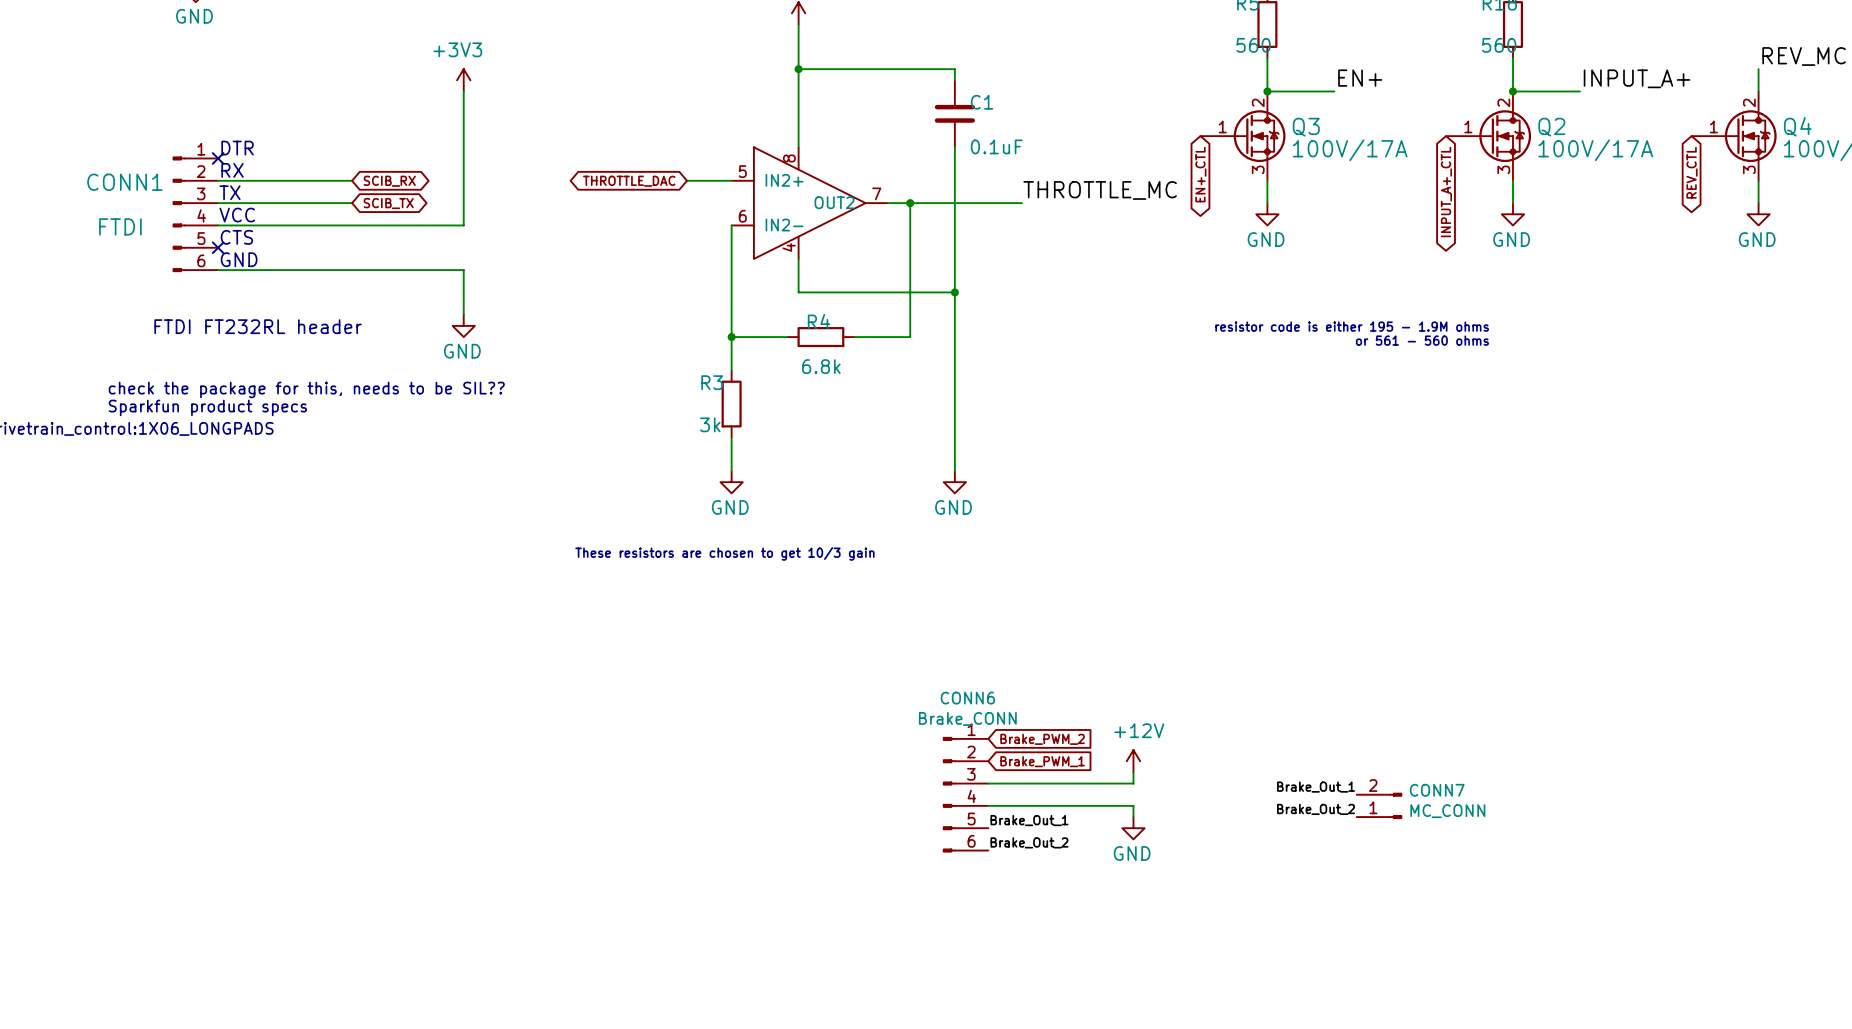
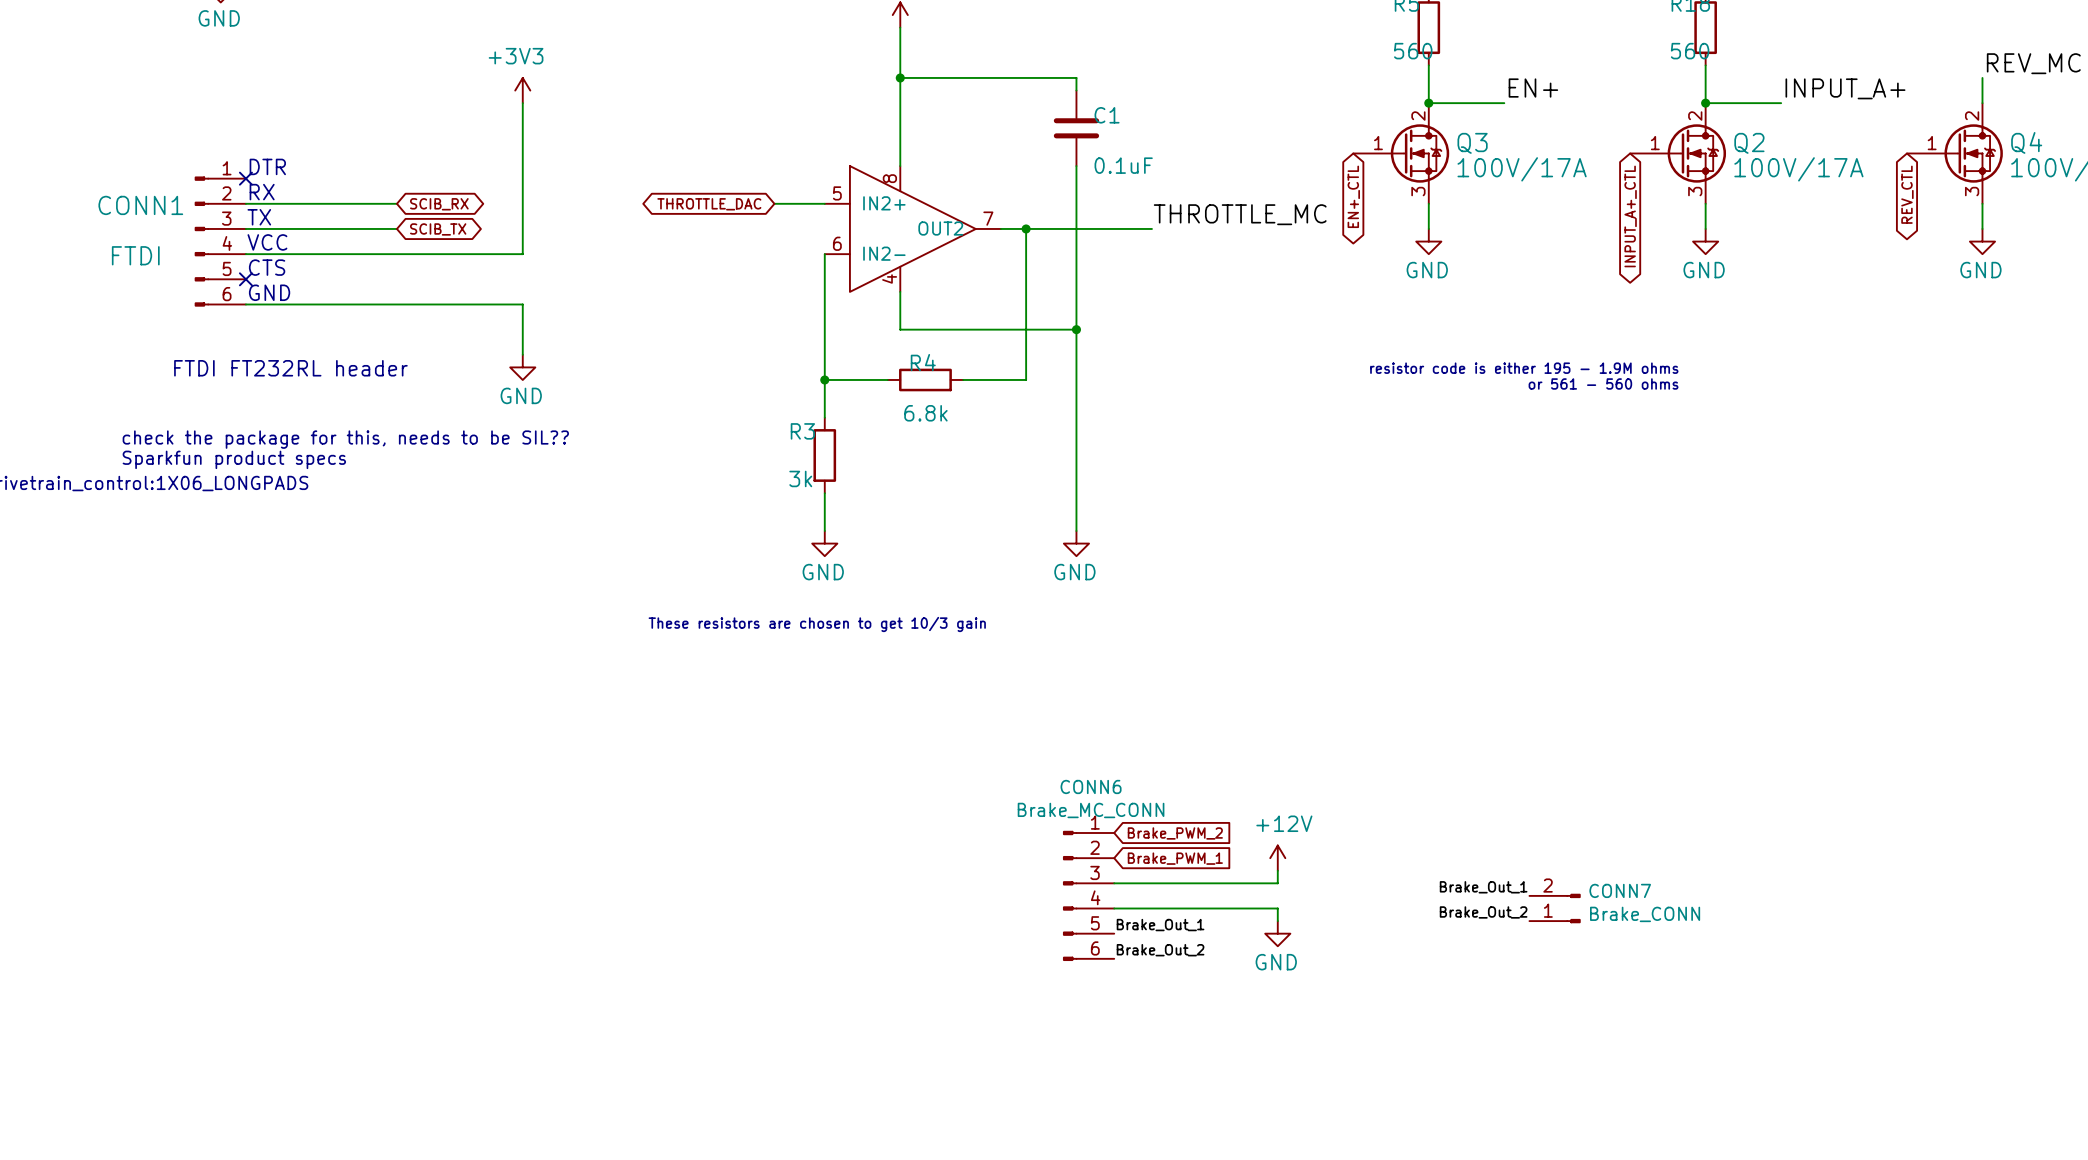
CONN6 value: Brake_CONN (967, 718) -> Brake_MC_CONN (1091, 810)
CONN7 value: MC_CONN (1447, 811) -> Brake_CONN (1645, 914)

